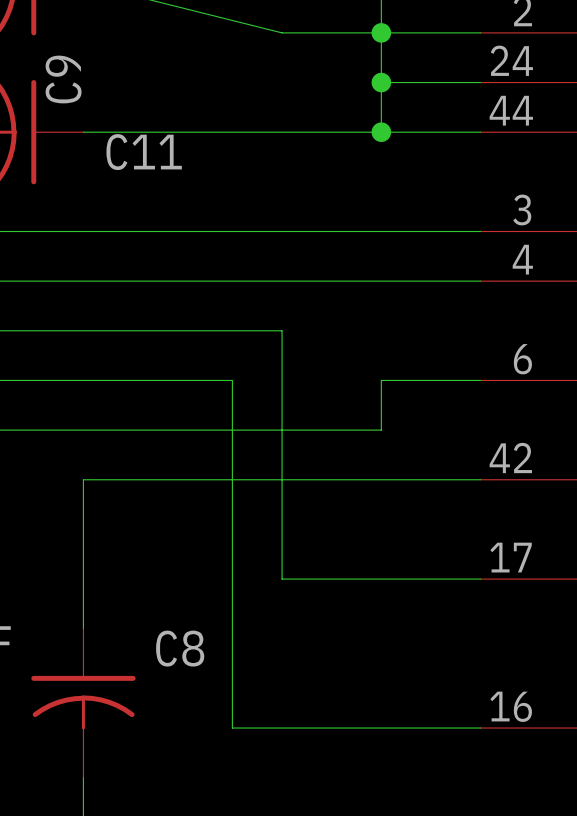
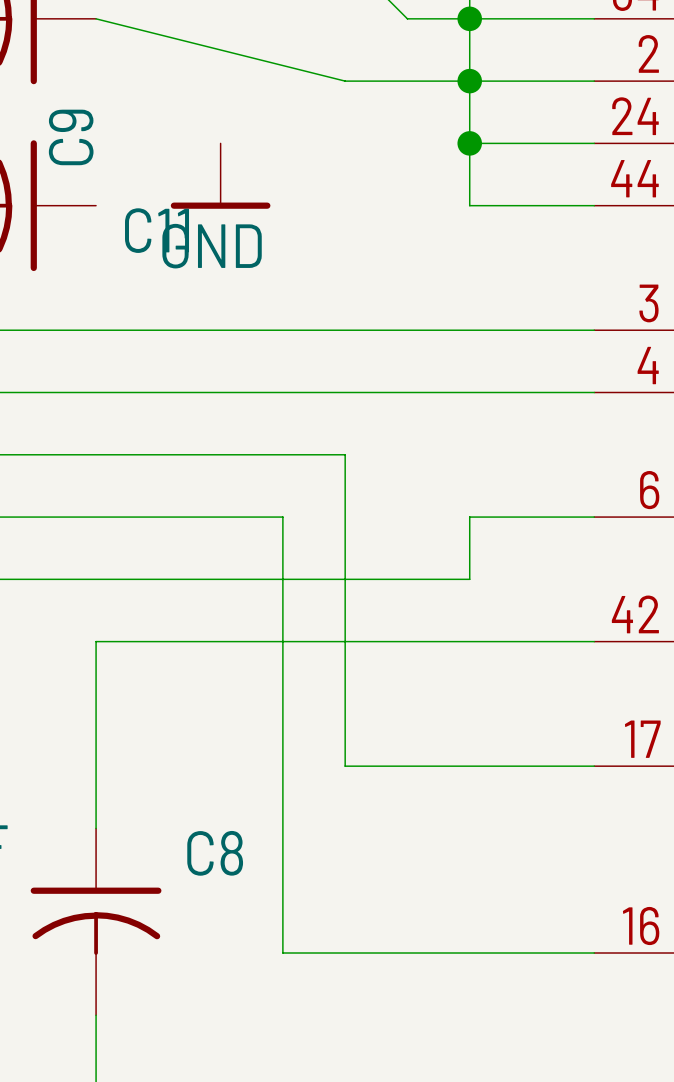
power symbol: none -> GND (220, 176)
wire: (83, 132) (381, 132) -> none
junction: (381, 132) -> none

